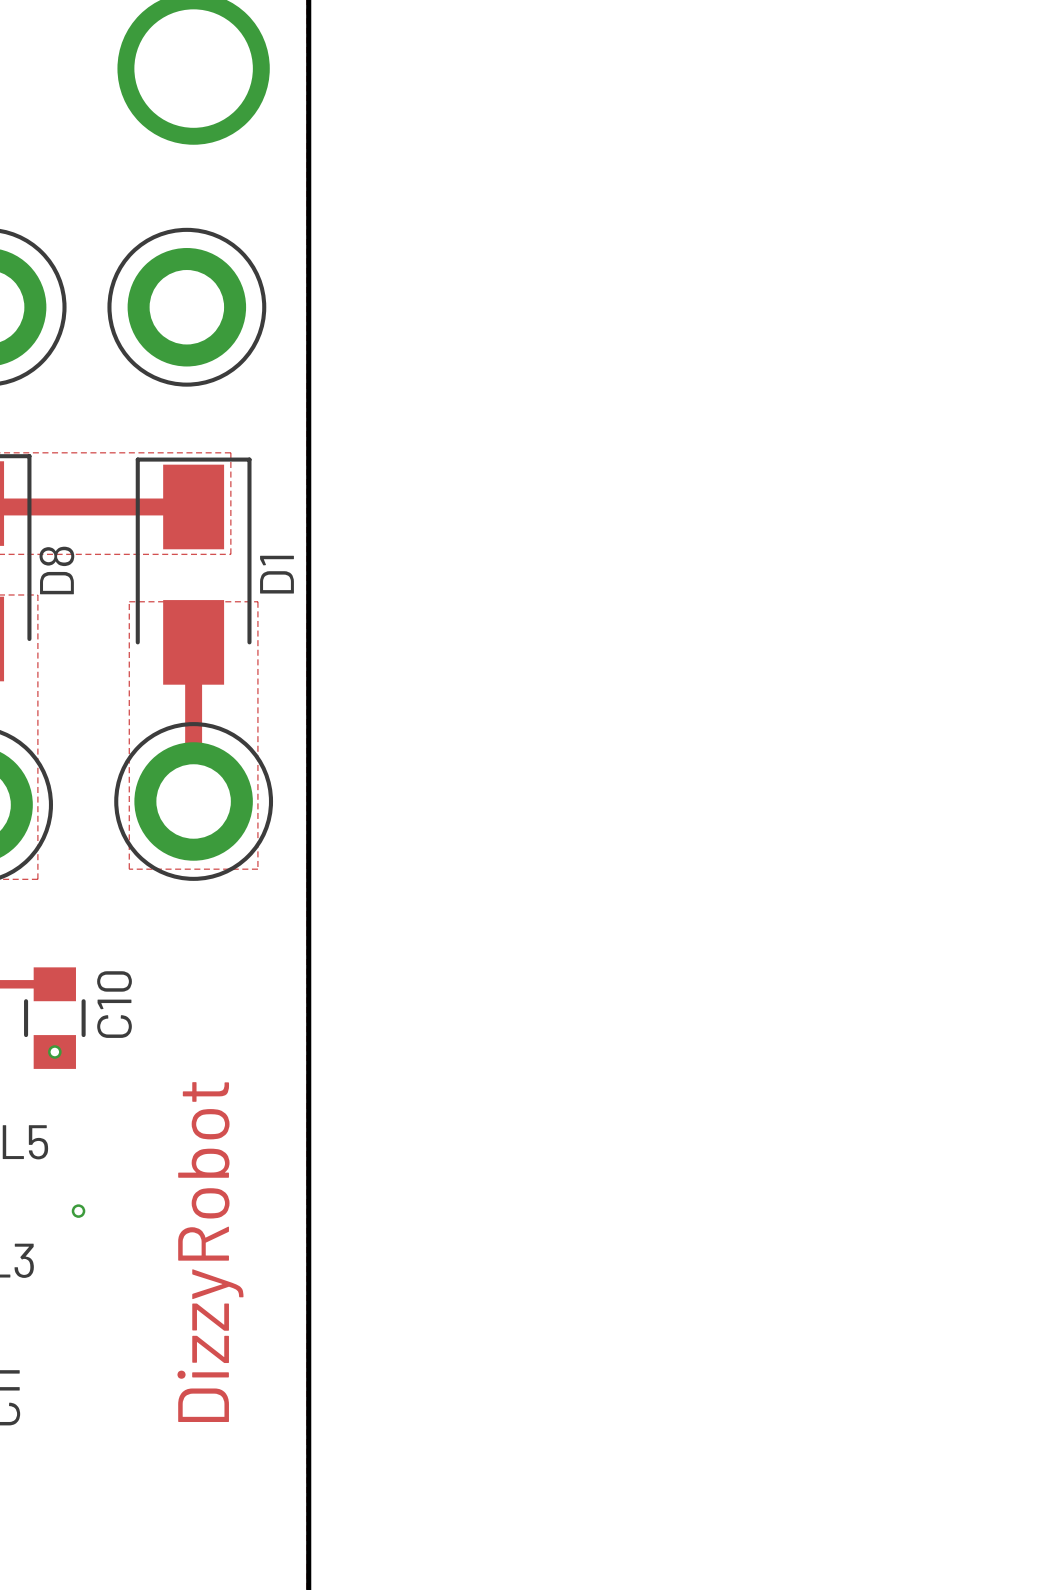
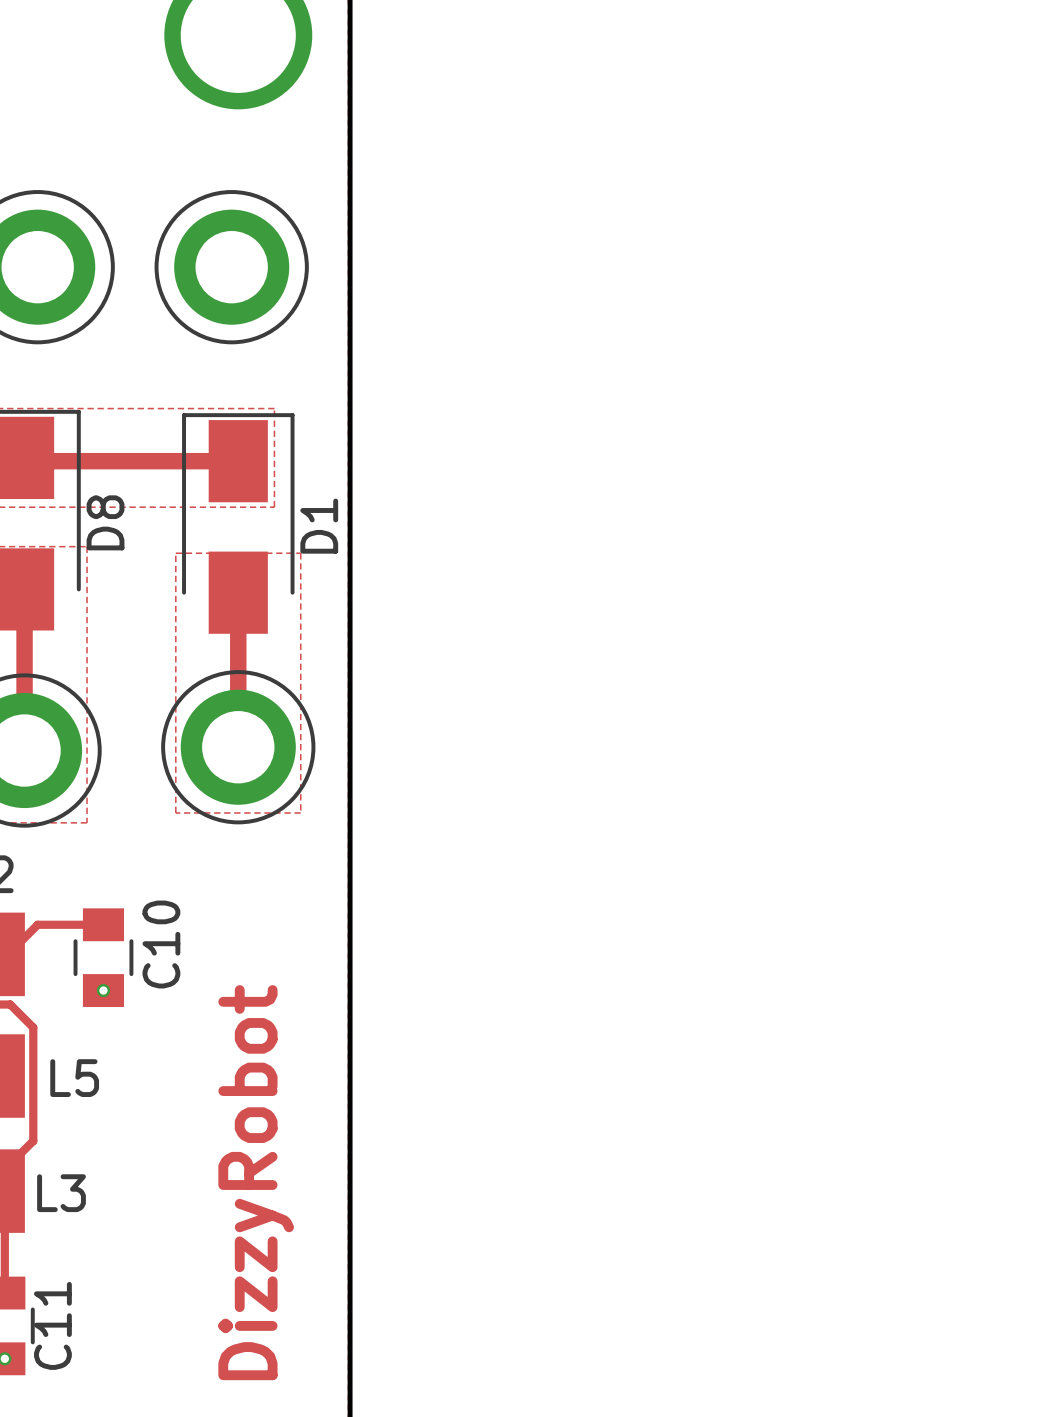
part: (78, 1211) -> none

